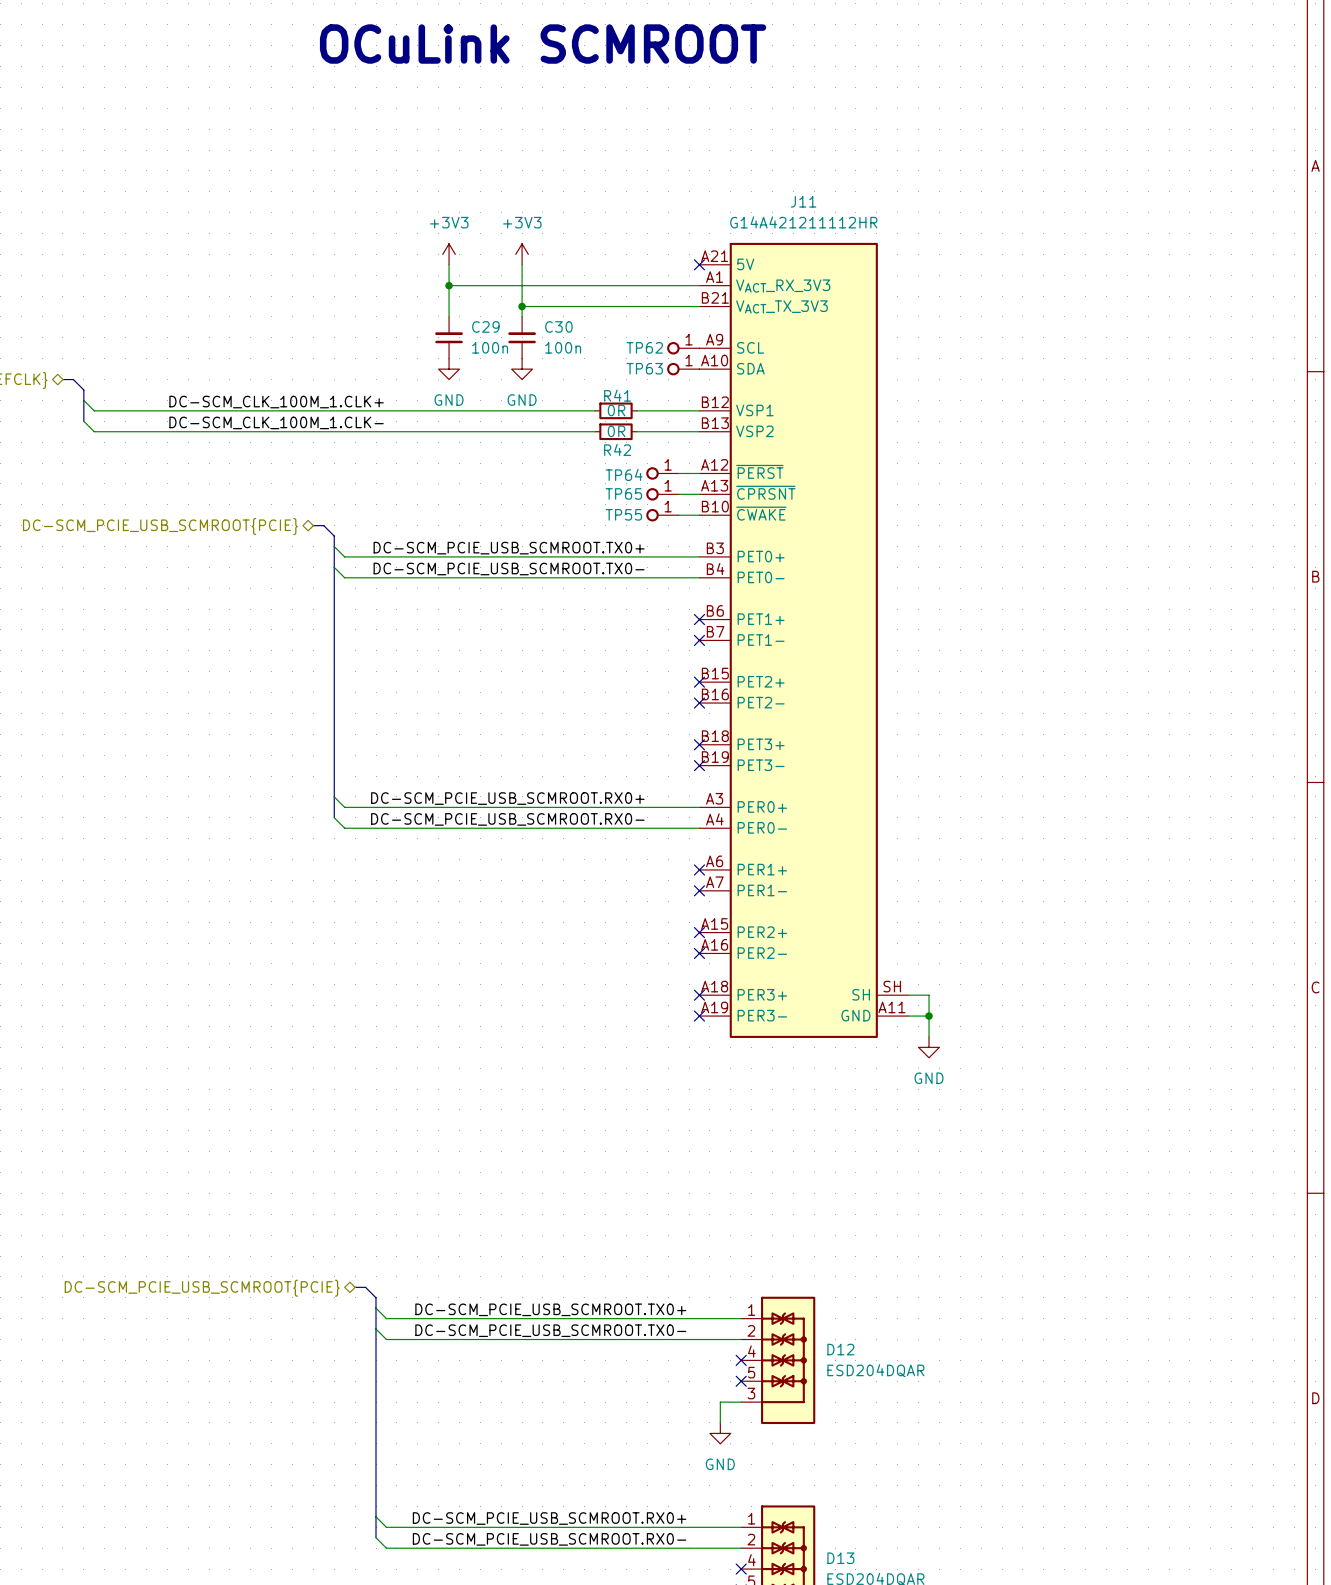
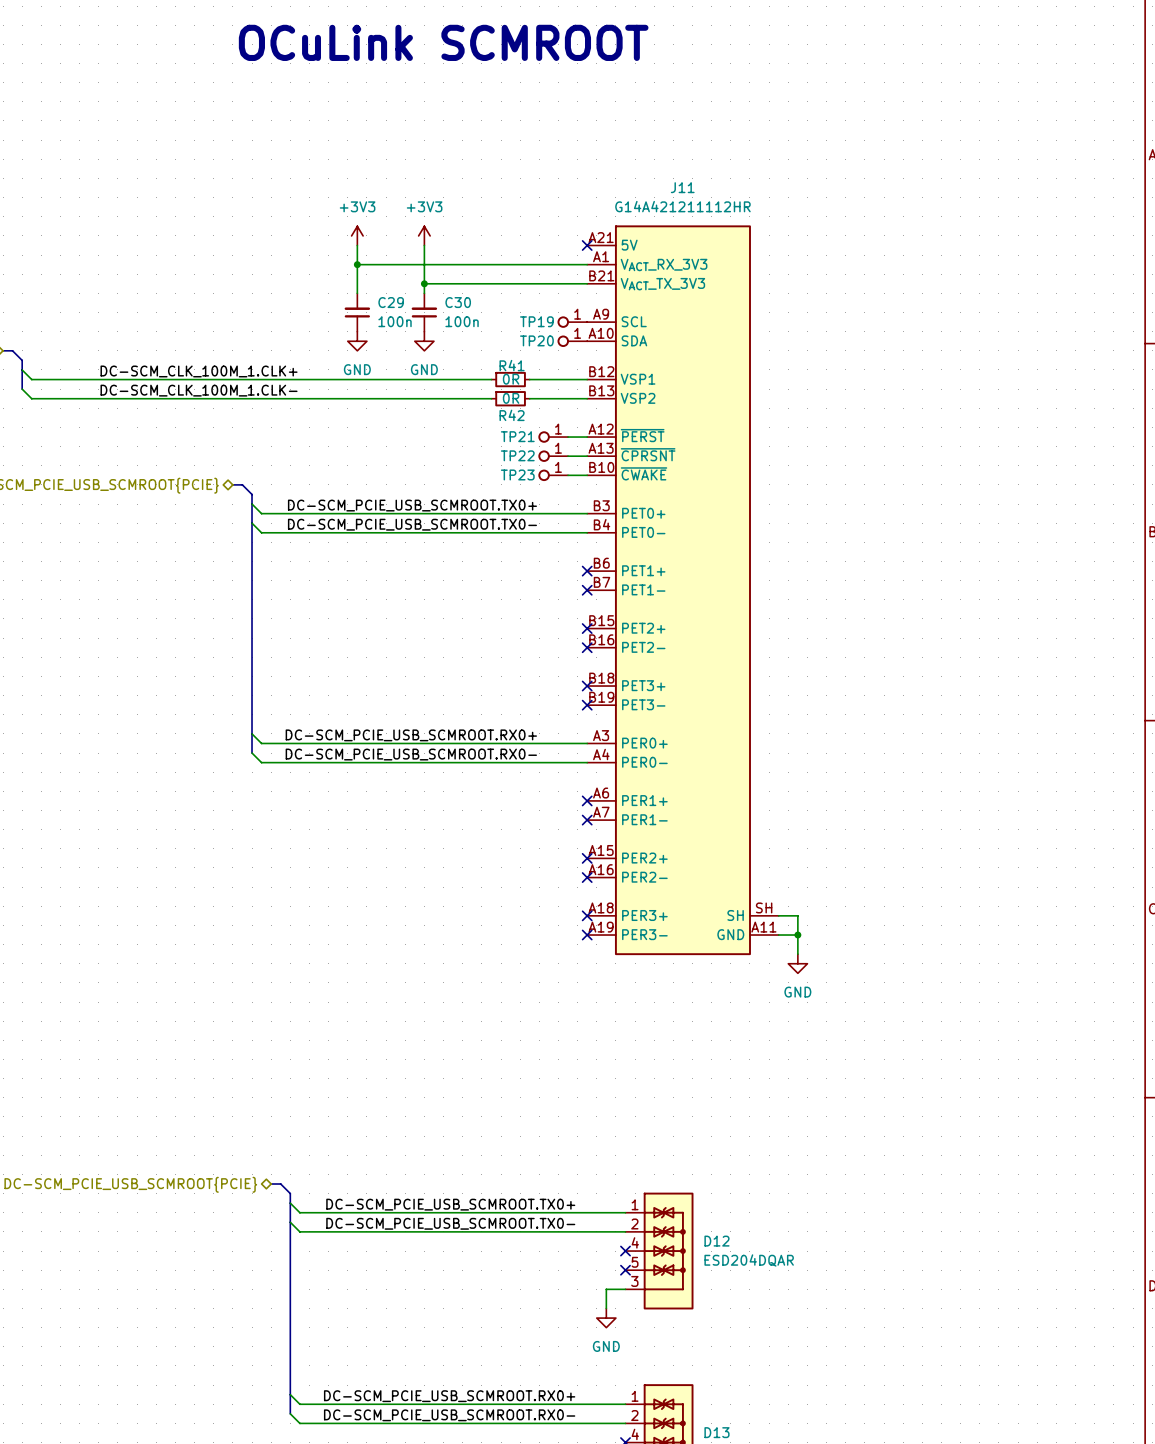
TP62 name: TP62 (644, 347) -> TP19 (536, 321)
TP63 name: TP63 (644, 368) -> TP20 (536, 340)
TP64 name: TP64 (624, 474) -> TP21 (517, 436)
TP65 name: TP65 (623, 493) -> TP22 (517, 455)
TP55 name: TP55 (623, 514) -> TP23 (517, 474)

